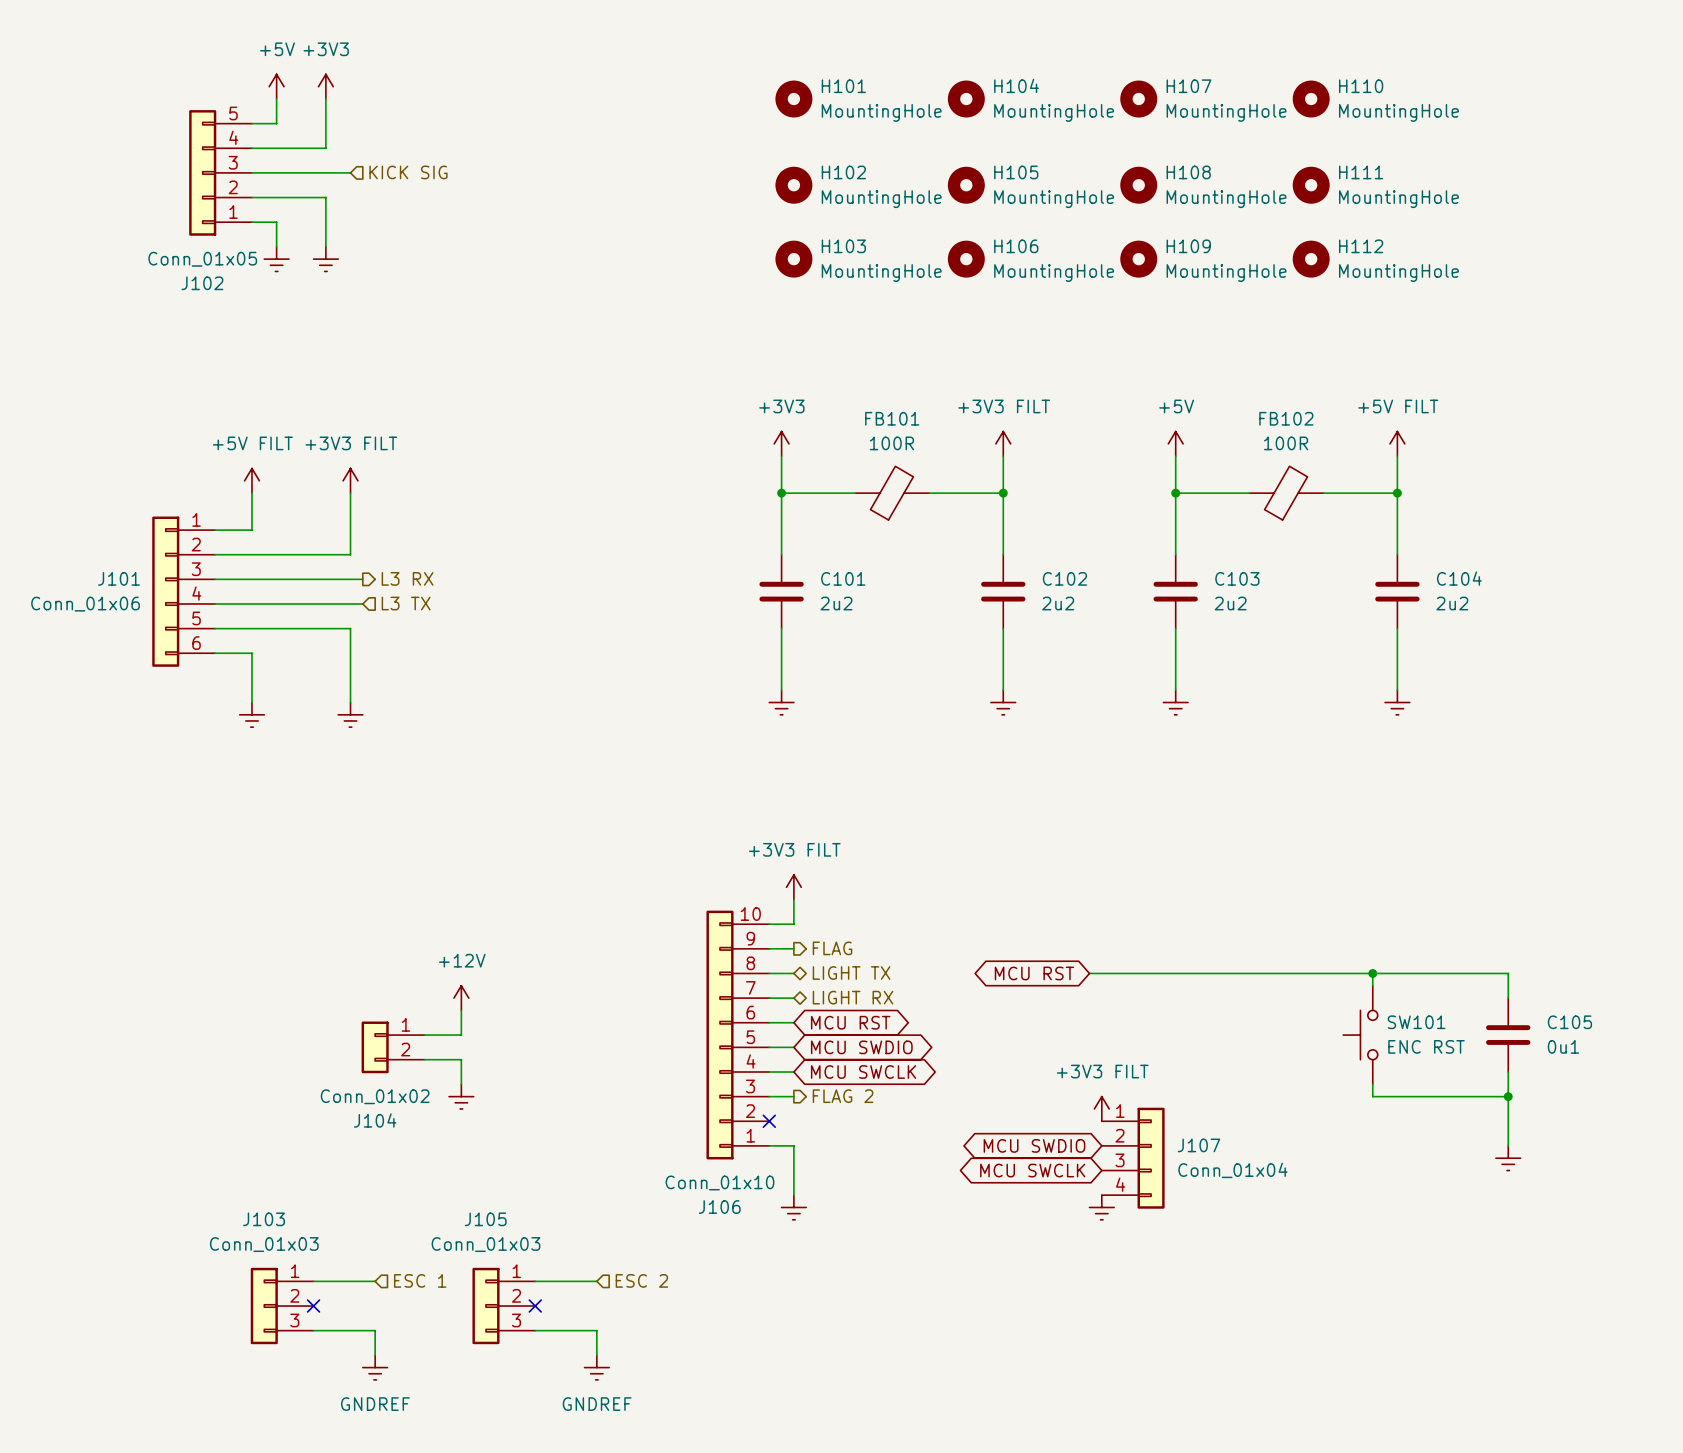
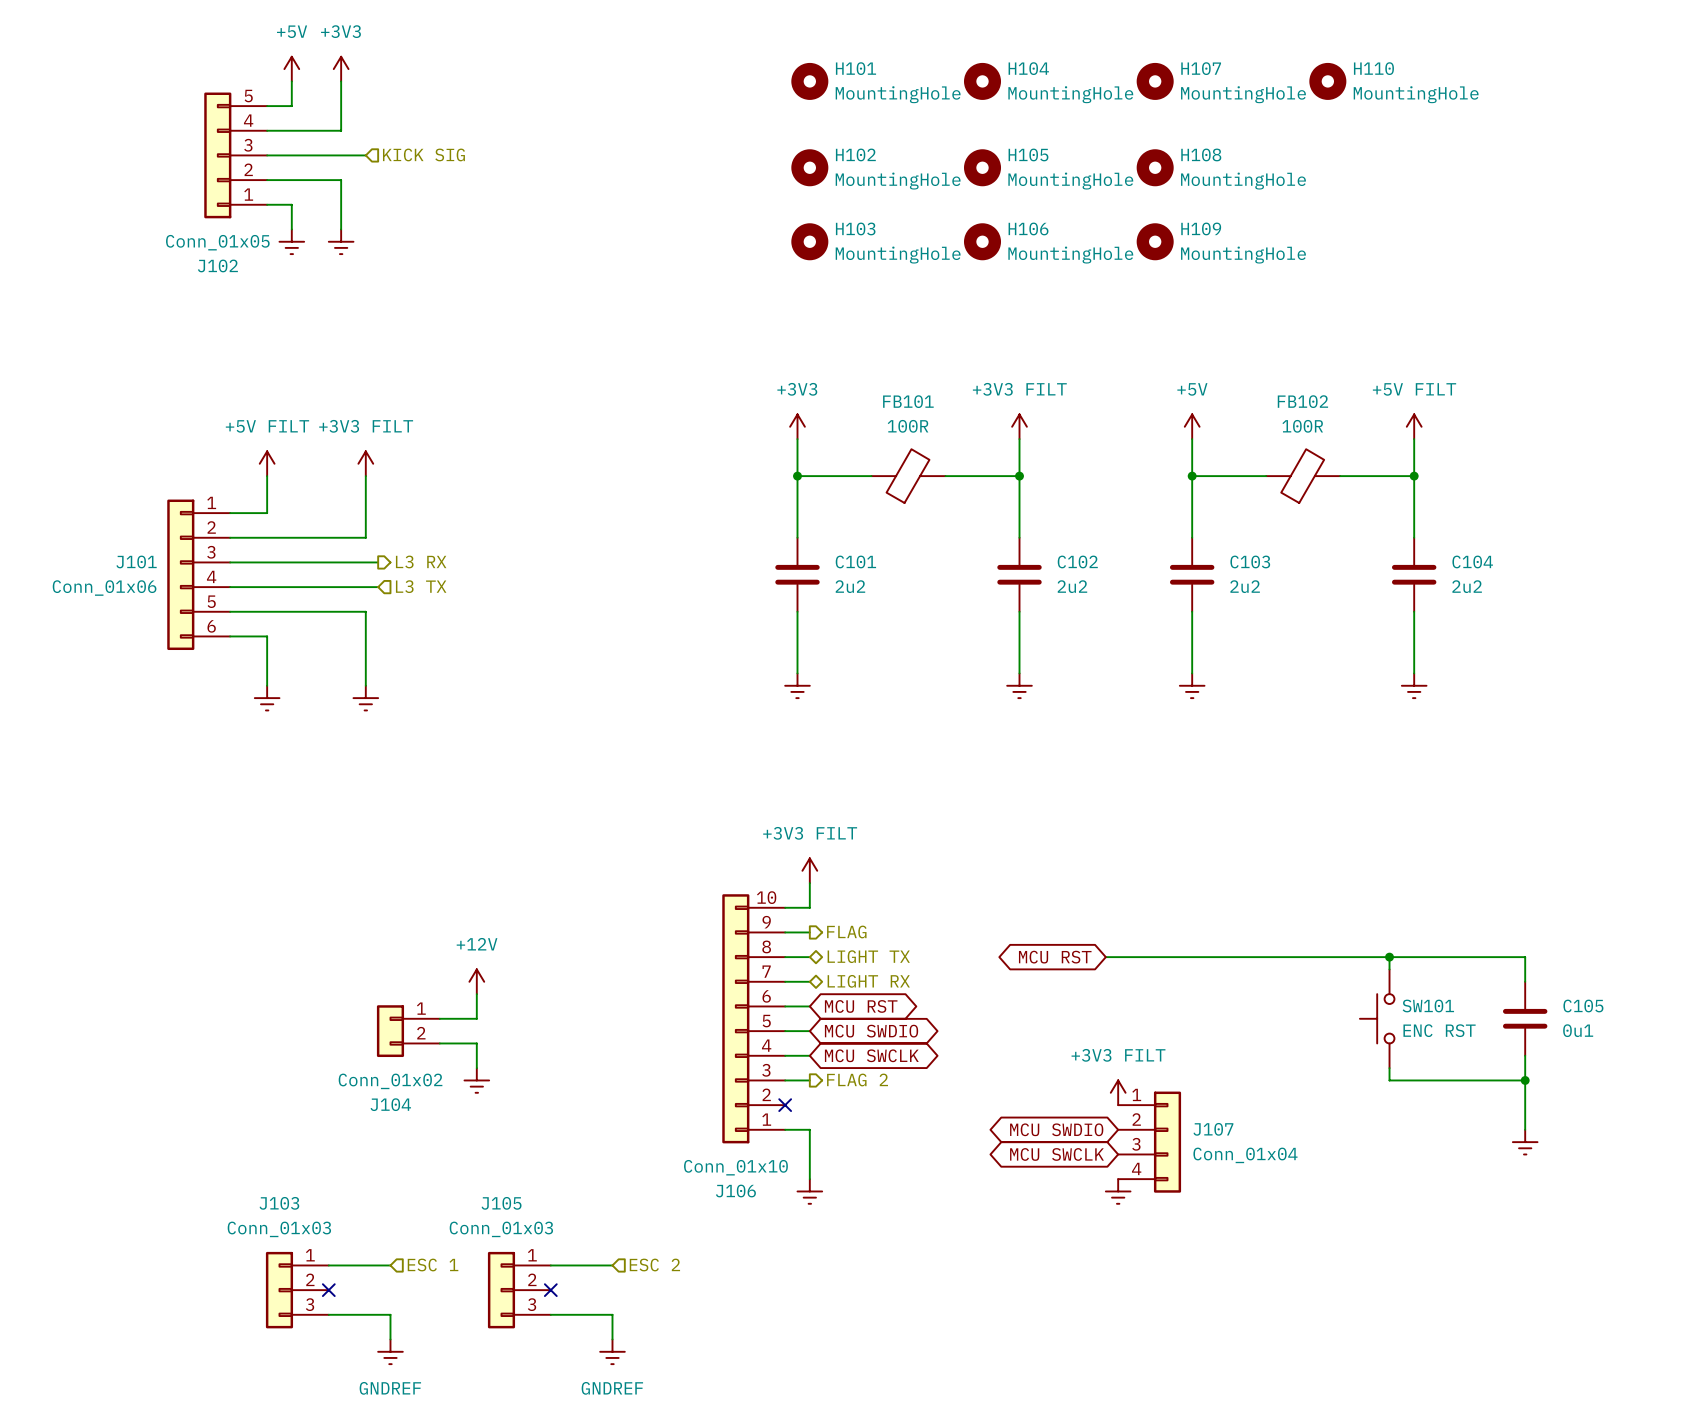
H111: MountingHole (1311, 185) -> none
H112: MountingHole (1311, 259) -> none

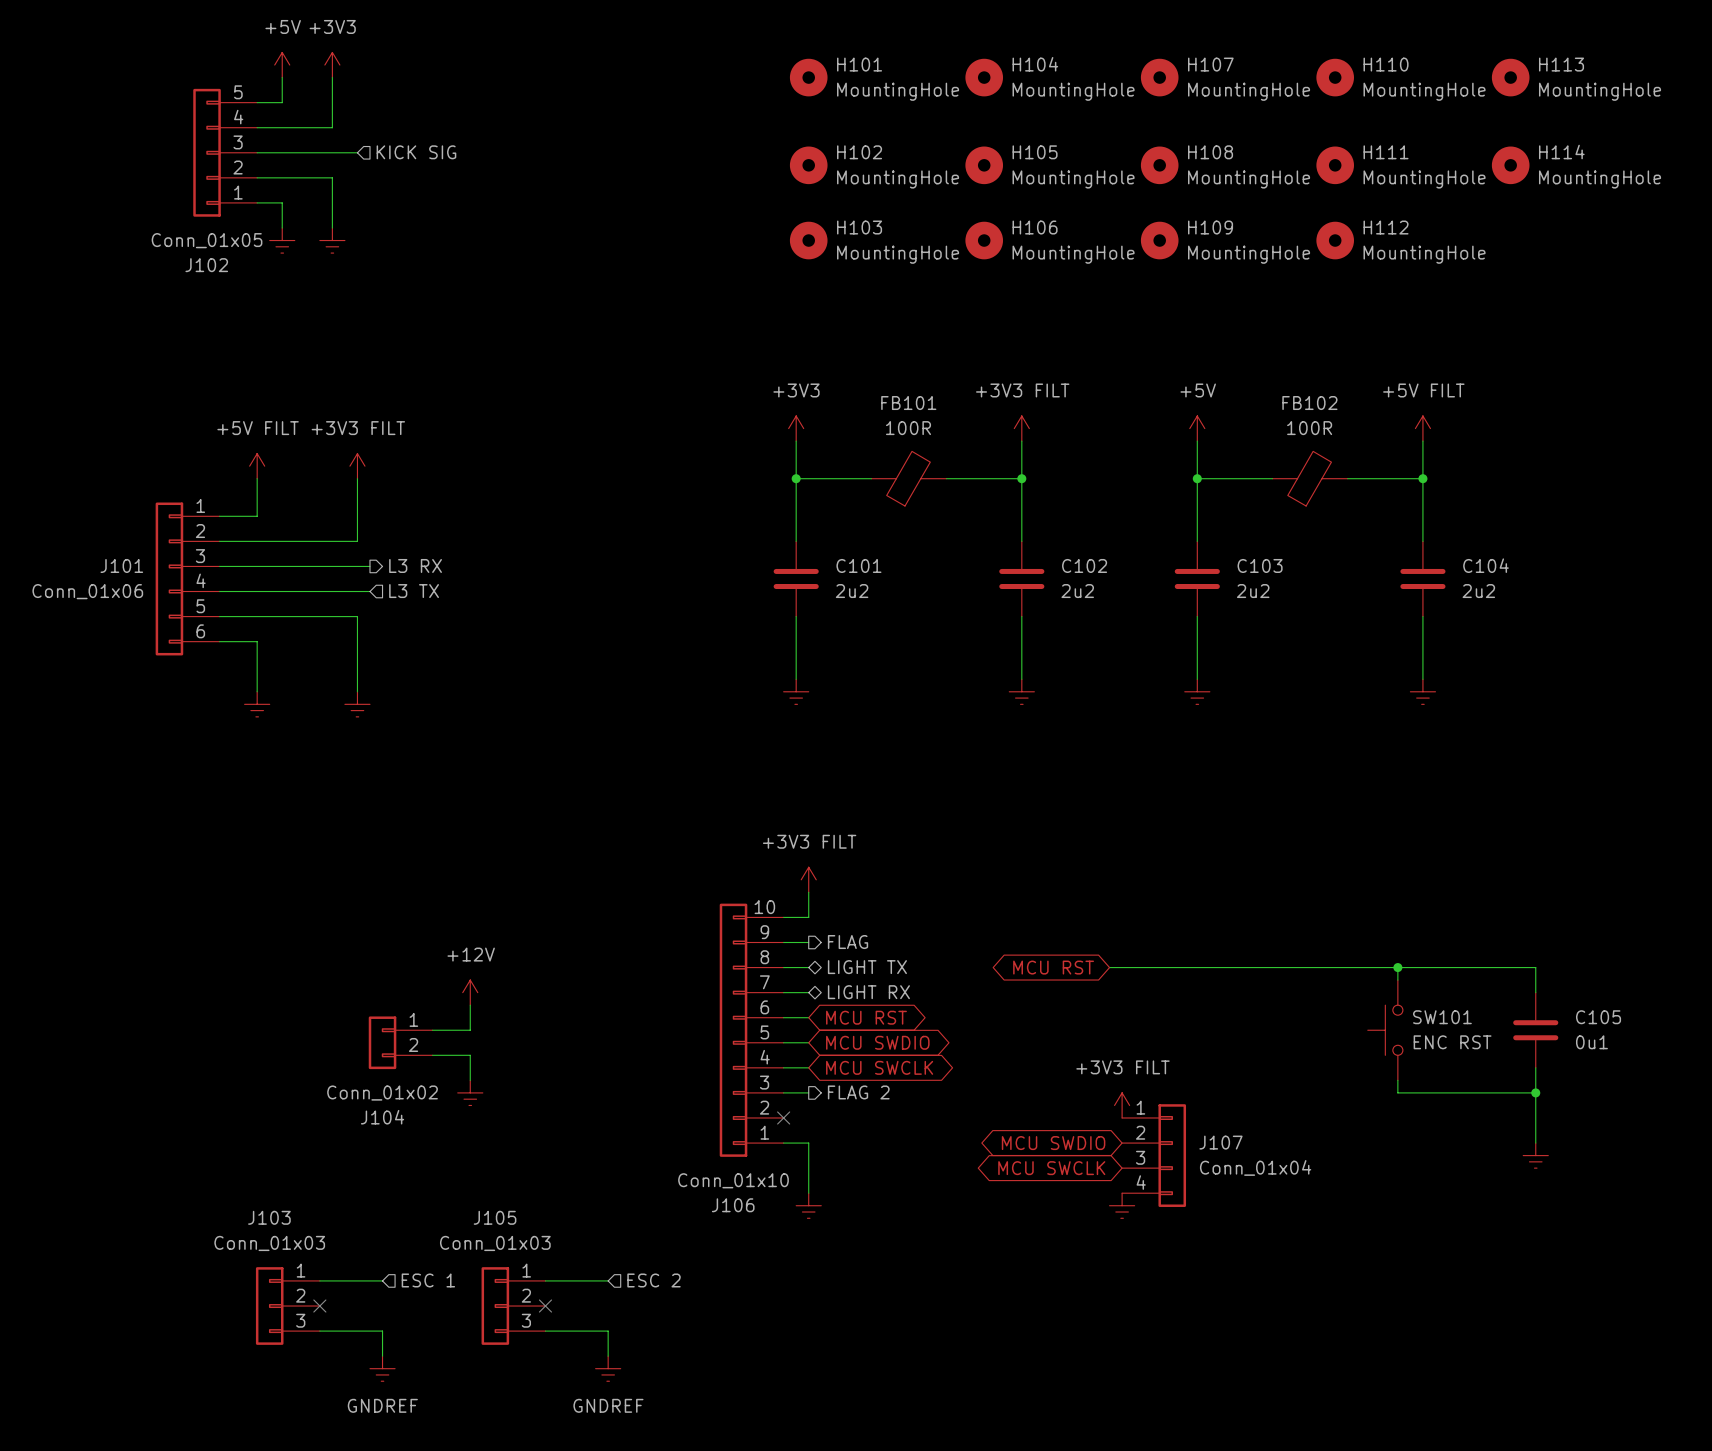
H113: none -> MountingHole (1510, 77)
H111: none -> MountingHole (1335, 165)
H114: none -> MountingHole (1510, 165)
H112: none -> MountingHole (1335, 240)

